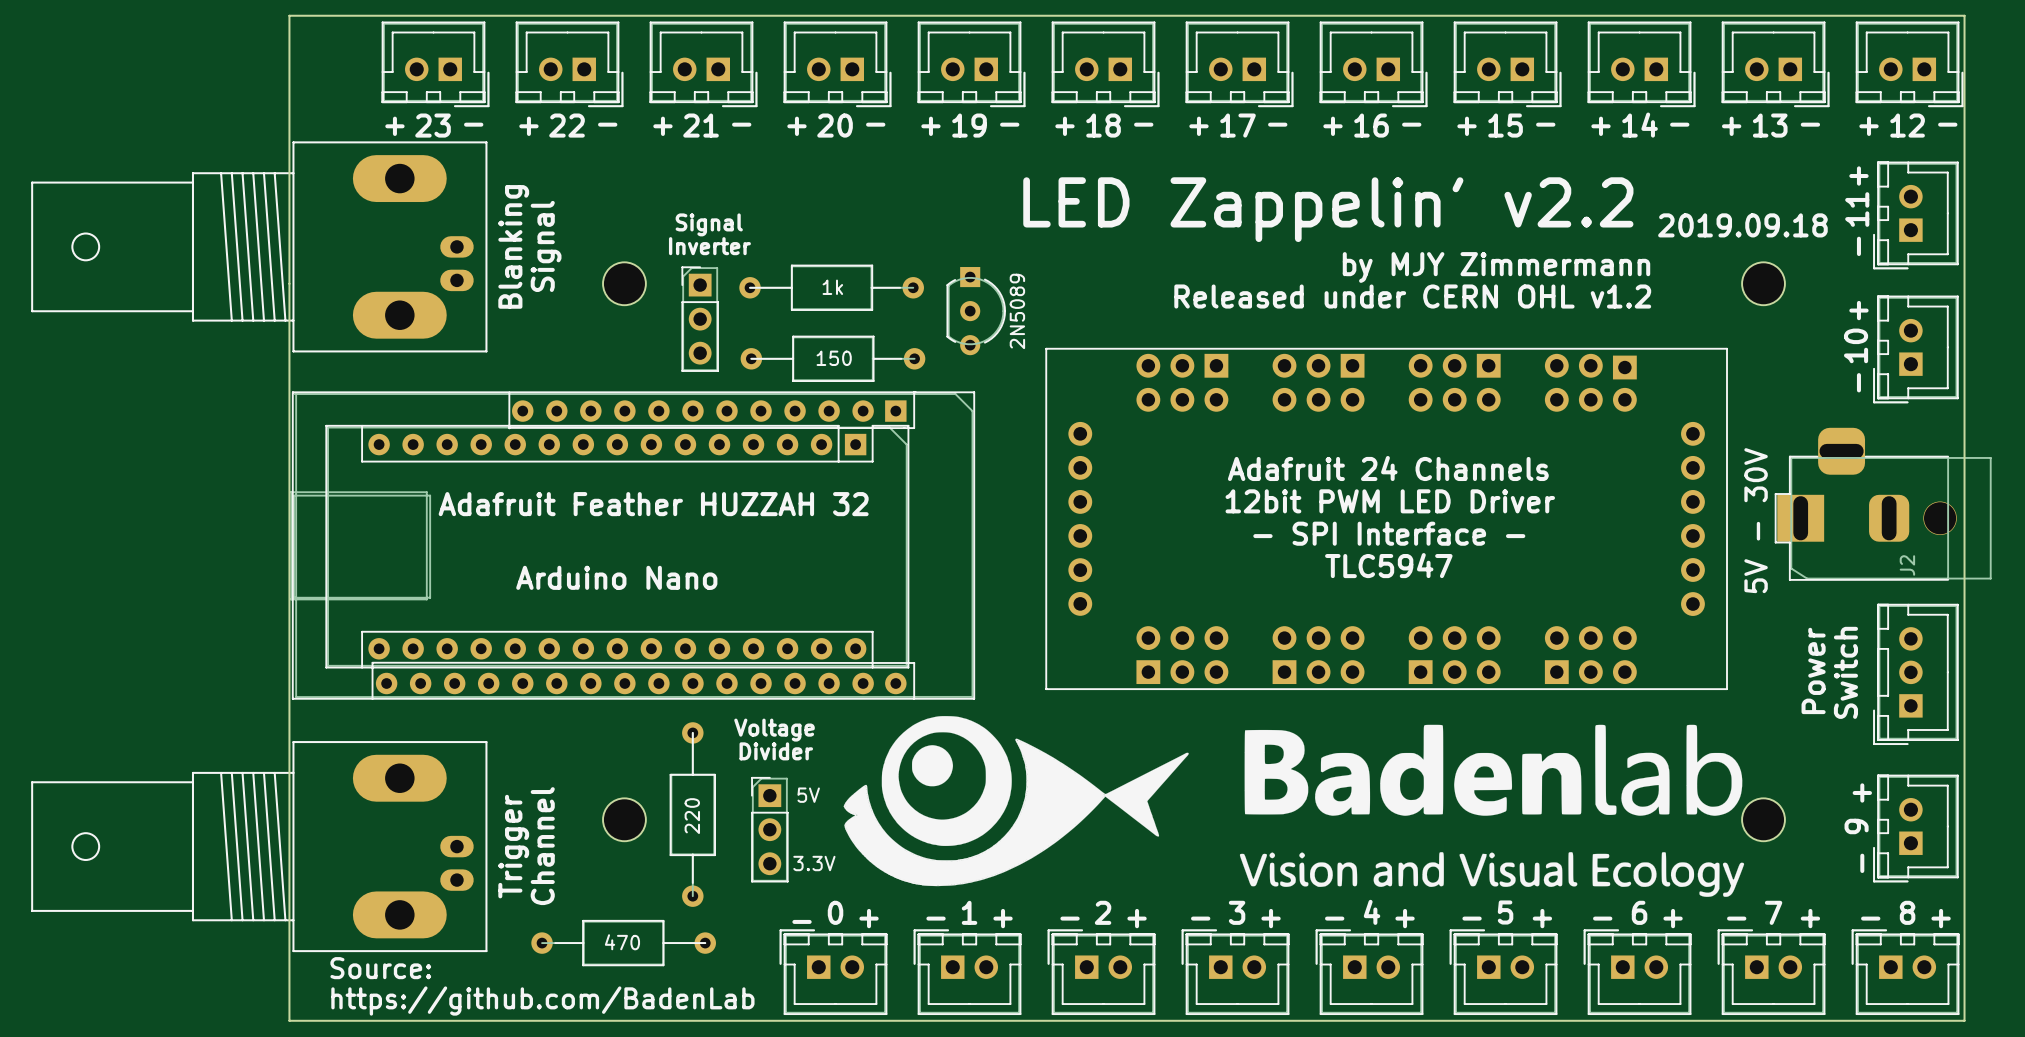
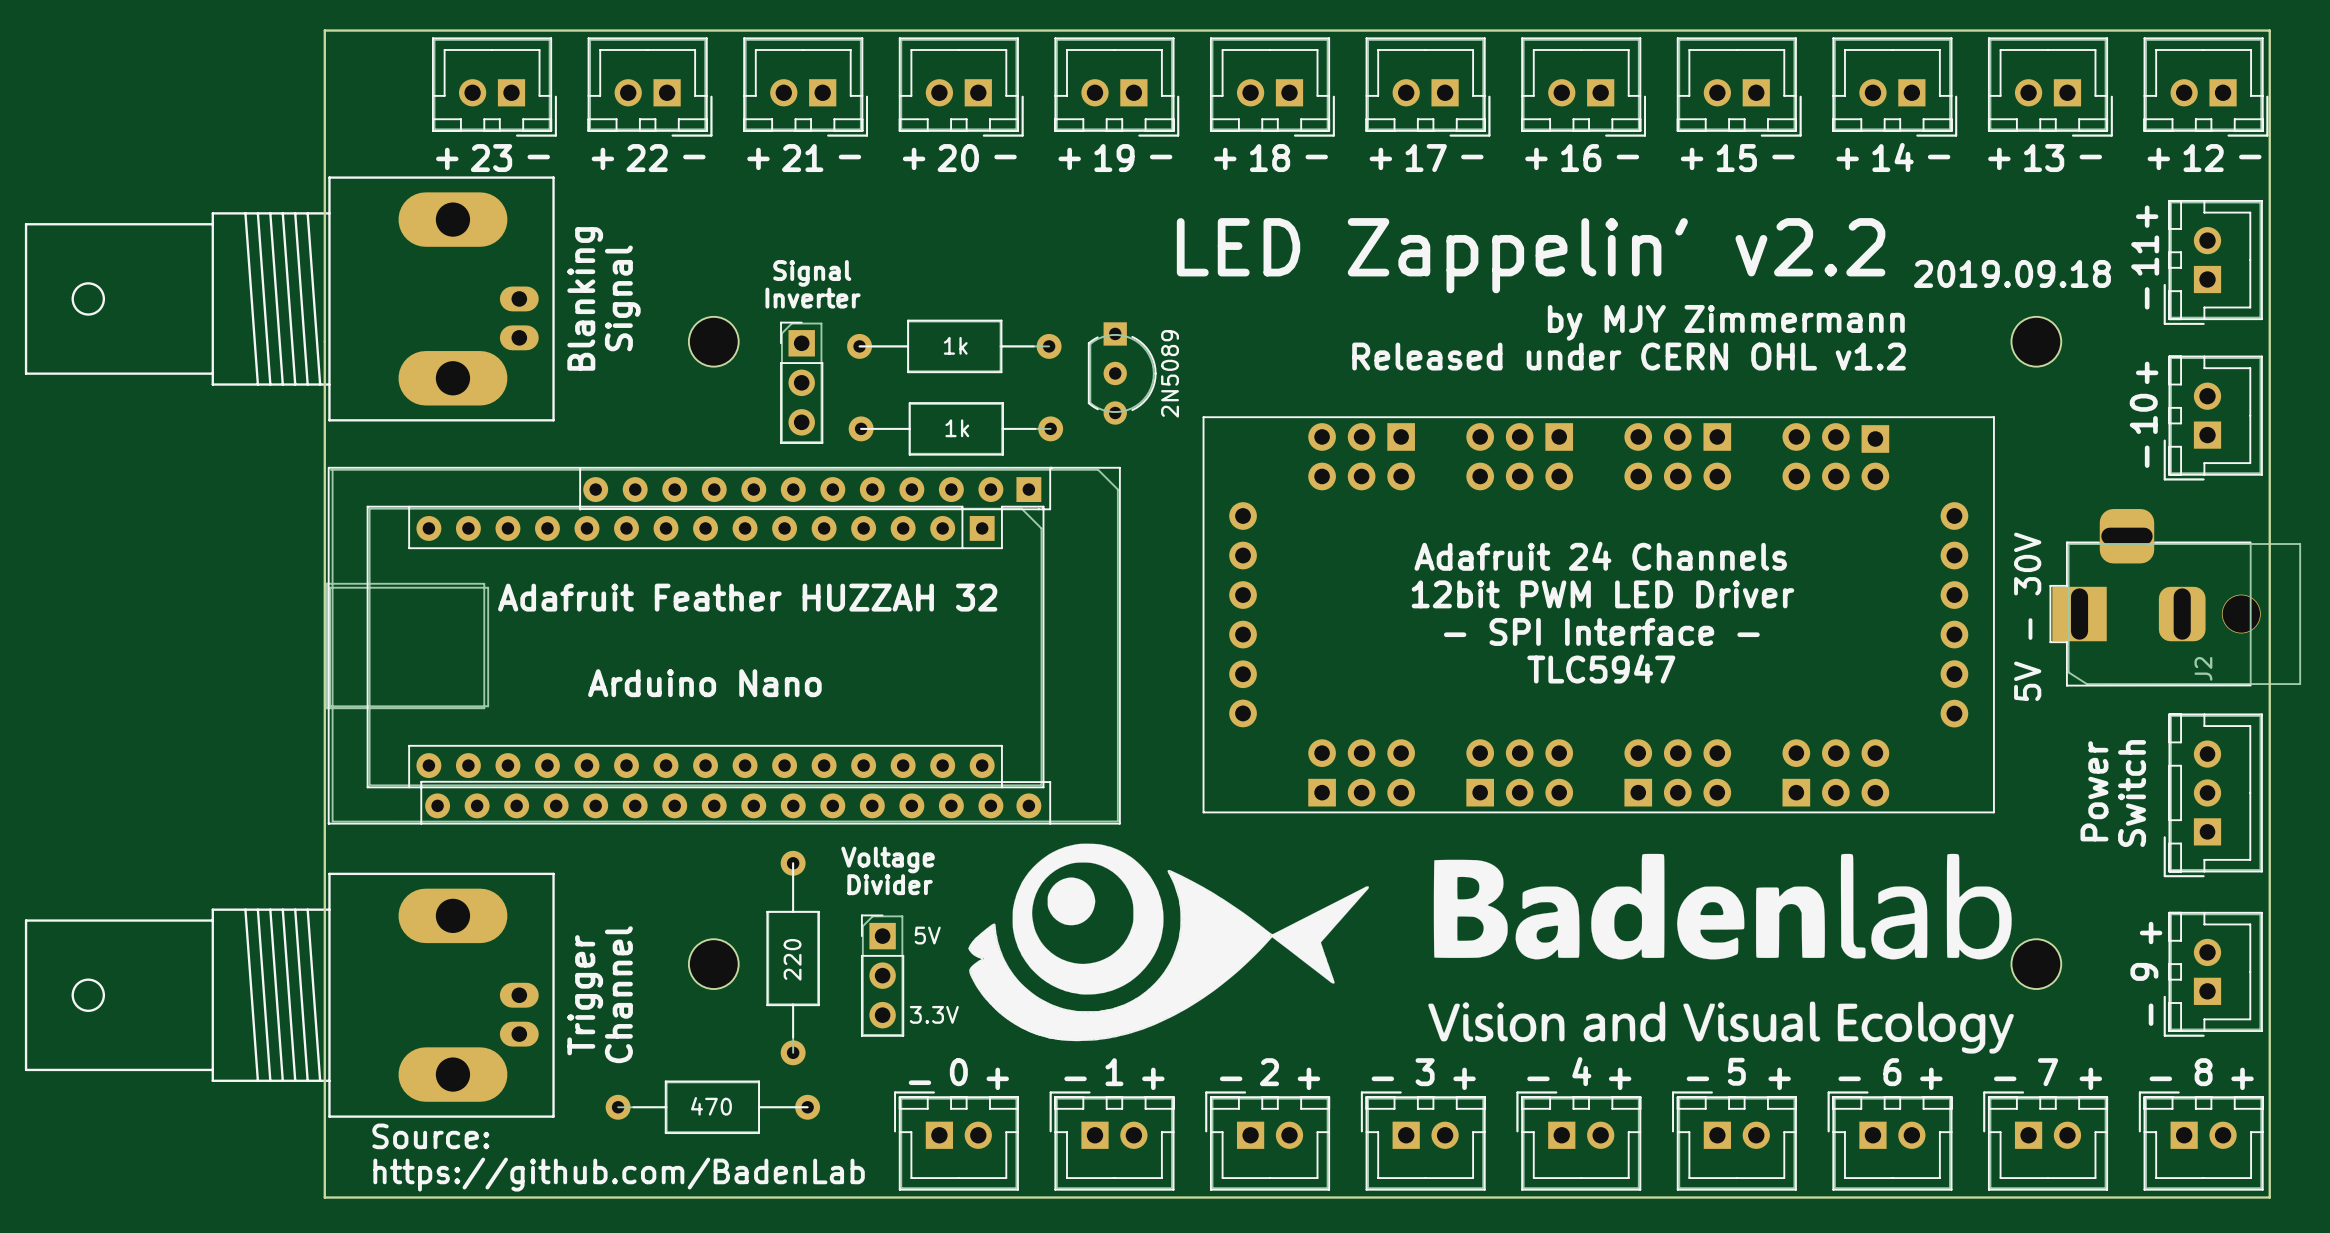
part value: 150 (834, 358) -> 1k (957, 428)

